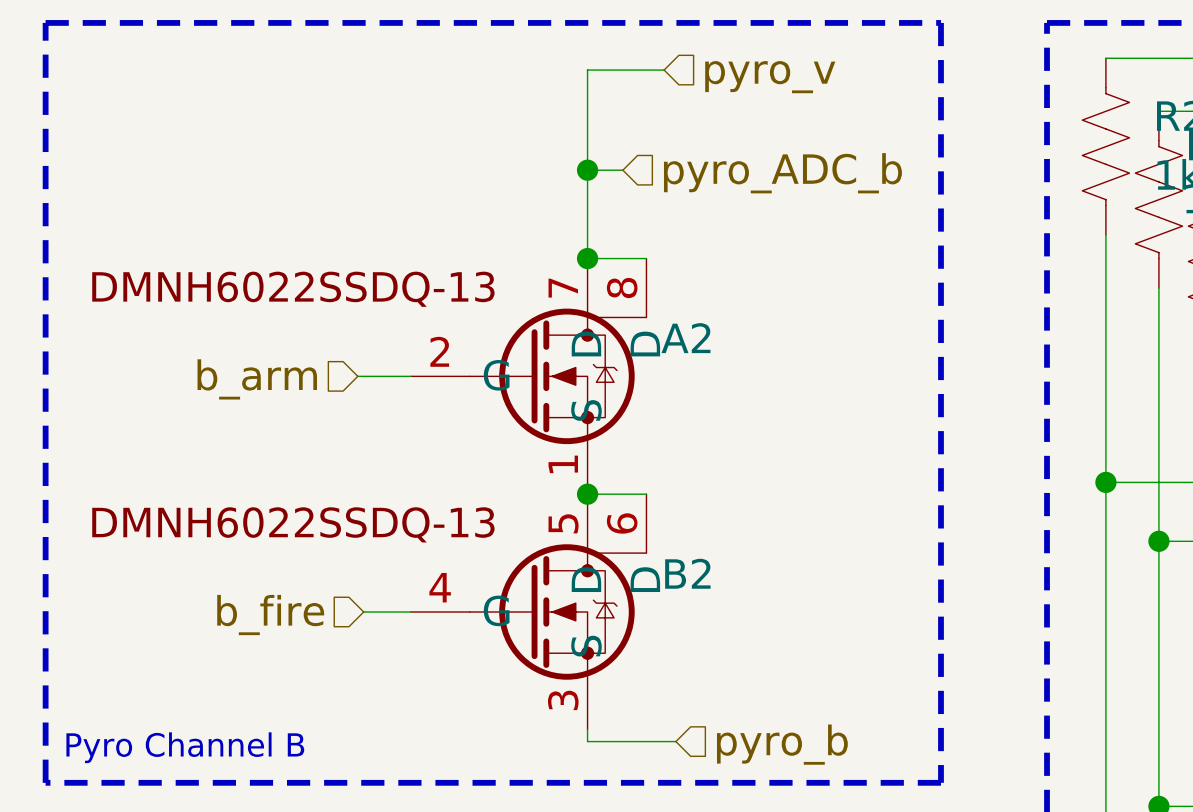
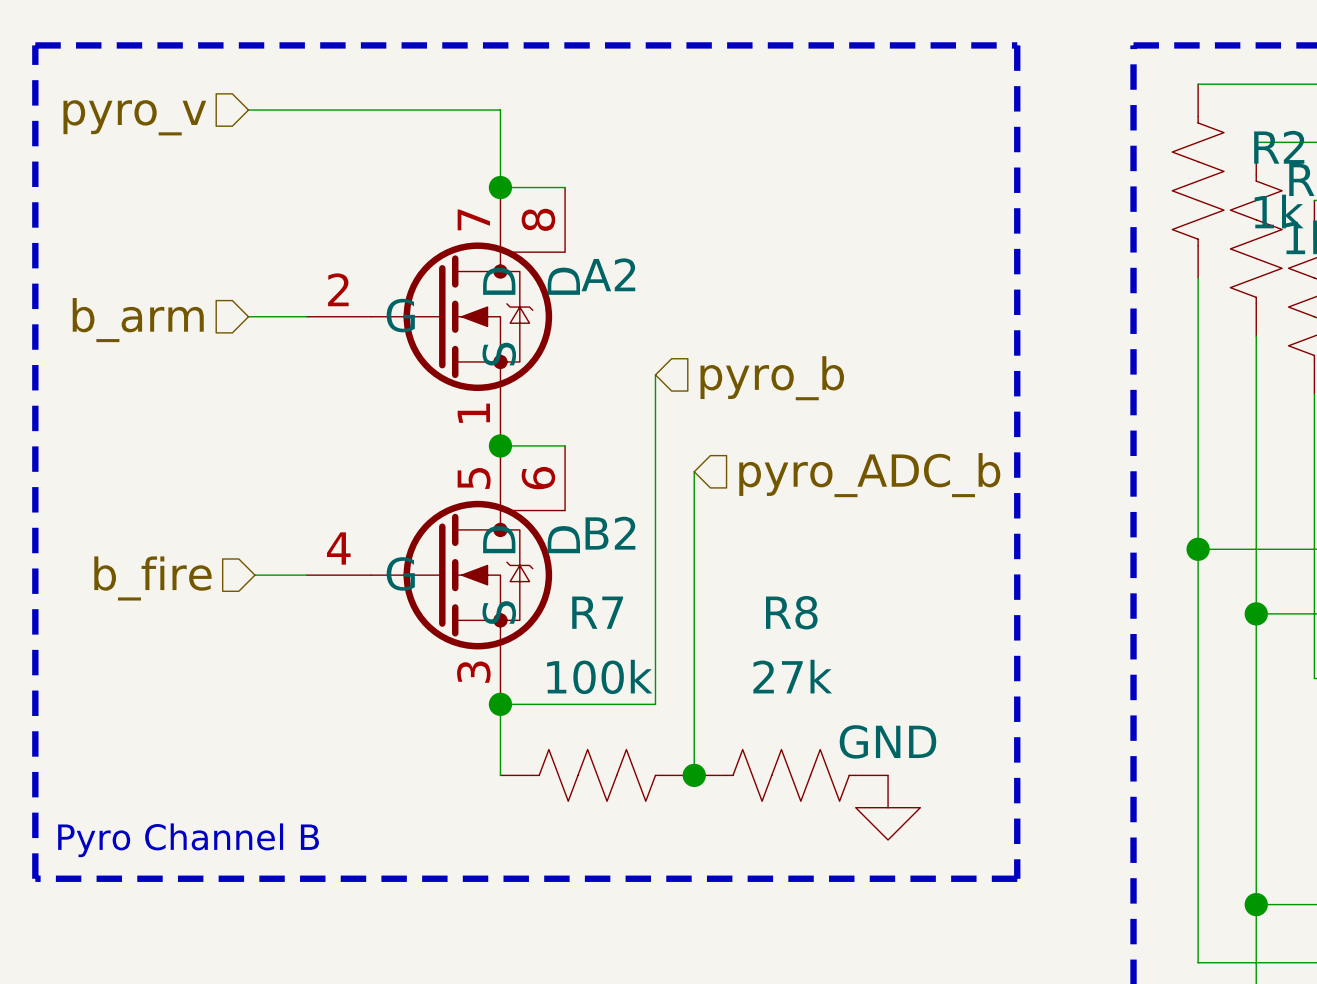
wire: (664, 70) (587, 70) (587, 258) (646, 258) -> none
hierarchical label rotation: 0° (770, 77) -> 180° (134, 117)
hierarchical label position: pyro_v (770, 77) -> pyro_v (134, 117)
wire: none -> (248, 110) (500, 110) (500, 187) (565, 187)
junction: none -> (500, 187)
wire: (587, 170) (622, 170) -> none
junction: (587, 170) -> none
hierarchical label position: pyro_ADC_b (782, 173) -> pyro_ADC_b (869, 475)
junction: (587, 258) -> none
A2 text: DMNH6022SSDQ-13 (293, 289) -> none
wire: none -> (655, 374) (655, 704) (500, 704) (500, 775)
wire: (357, 376) (410, 376) -> (248, 316) (306, 316)
A2 position: (528, 376) -> (435, 316)
hierarchical label position: b_arm (257, 379) -> b_arm (138, 320)
junction: none -> (500, 445)
wire: none -> (694, 471) (694, 775)
wire: (587, 494) (646, 494) -> (500, 445) (565, 445)
junction: (587, 494) -> none
B2 text: DMNH6022SSDQ-13 (293, 524) -> none
wire: (363, 611) (410, 611) -> (254, 575) (306, 575)
B2 position: (528, 611) -> (435, 575)
hierarchical label position: b_fire (270, 615) -> b_fire (152, 578)
junction: none -> (500, 704)
R7: none -> 100k (597, 775)
junction: none -> (694, 775)
R8: none -> 27k (791, 775)
power symbol: none -> GND (888, 807)
wire: (587, 729) (587, 741) (675, 741) -> none
hierarchical label position: pyro_b (782, 744) -> pyro_b (772, 378)

